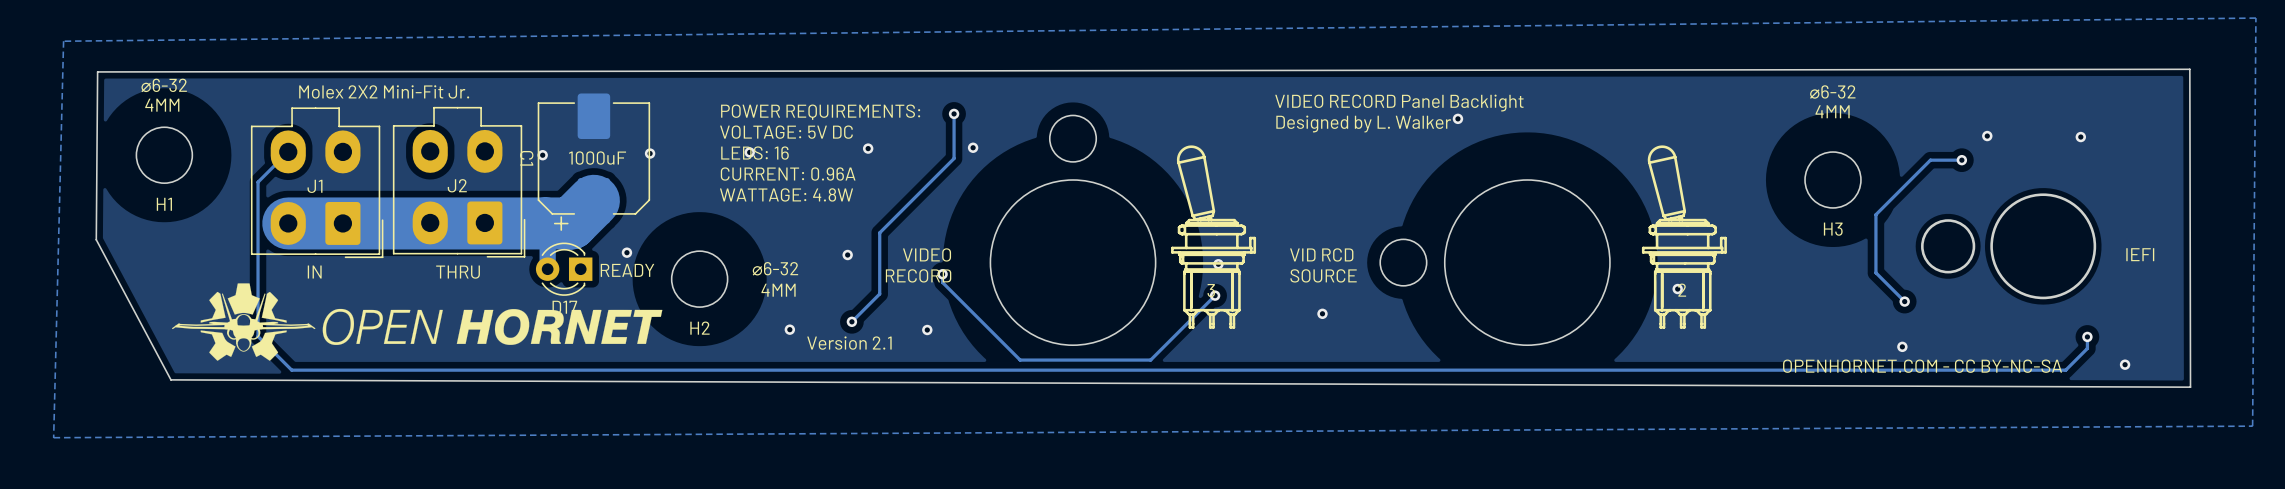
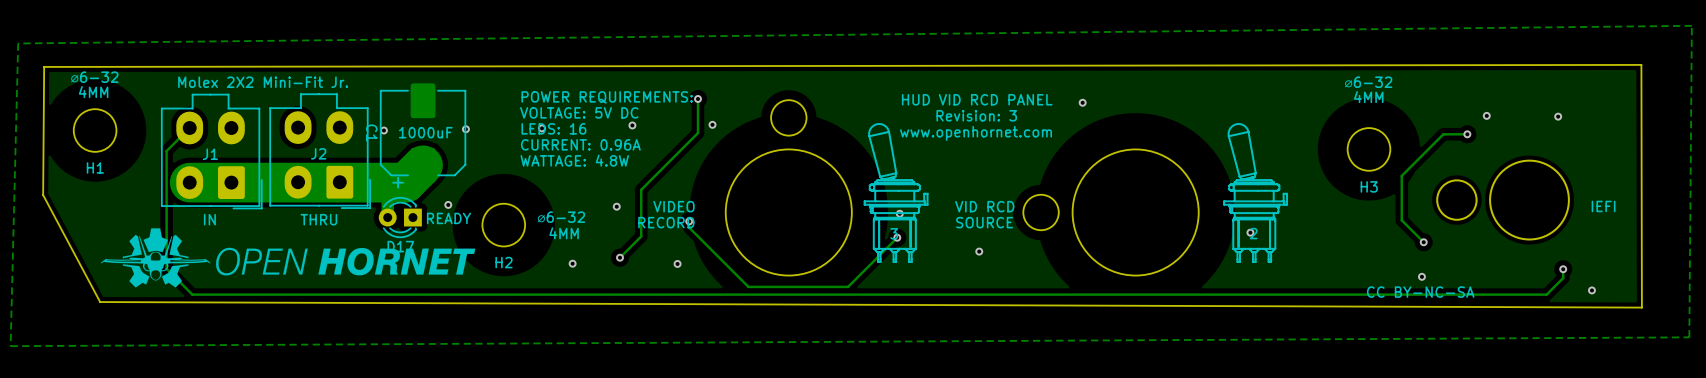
text: VIDEO RECORD Panel Backlight (1399, 103) -> none
text: none -> HUD VID RCD PANEL (977, 99)
text: Designed by L. Walker (1363, 124) -> none
text: none -> Revision: 3 (976, 115)
text: none -> www.openhornet.com (976, 133)
text: Version 2.1 (849, 343) -> none
text: none -> CC BY-NC-SA (1420, 292)
text: OPENHORNET.COM - CC BY-NC-SA (1922, 366) -> none

